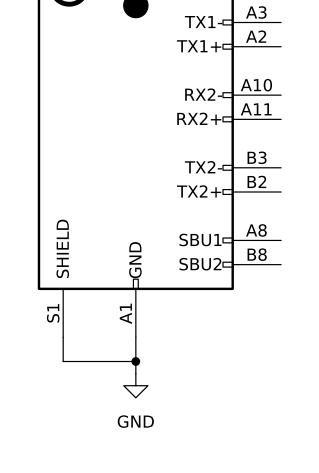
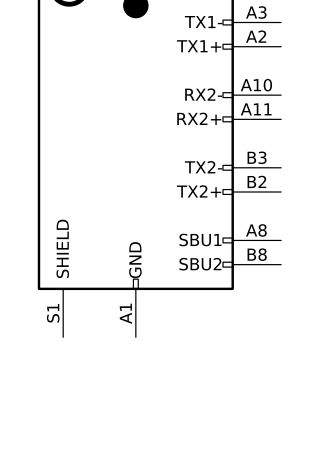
wire: (63, 337) (63, 361) (135, 361) -> none
wire: (135, 337) (135, 373) -> none
junction: (135, 361) -> none
power symbol: GND (135, 385) -> none

